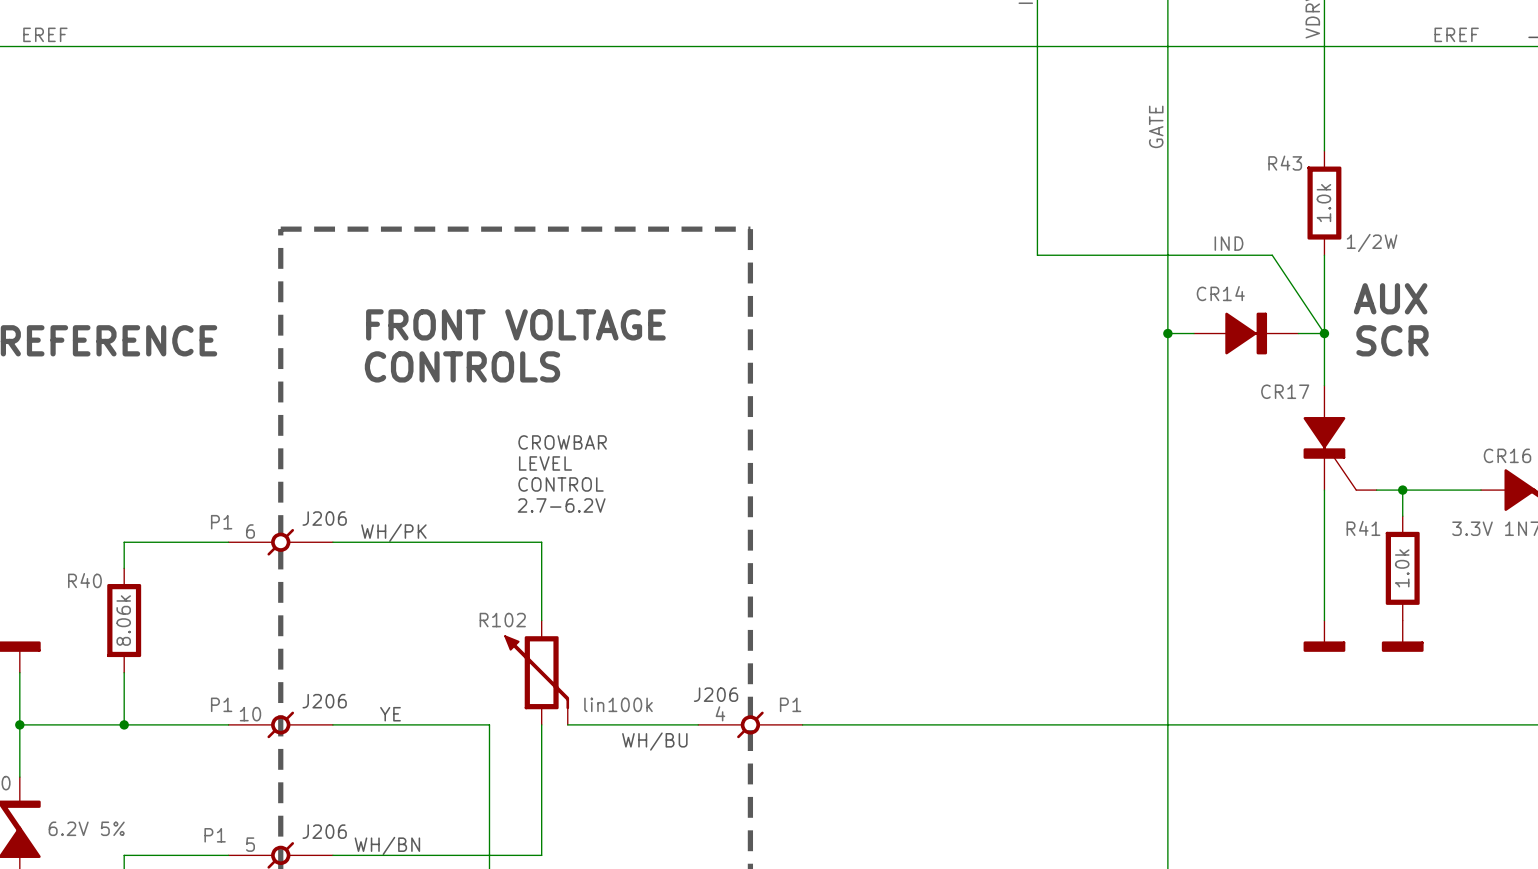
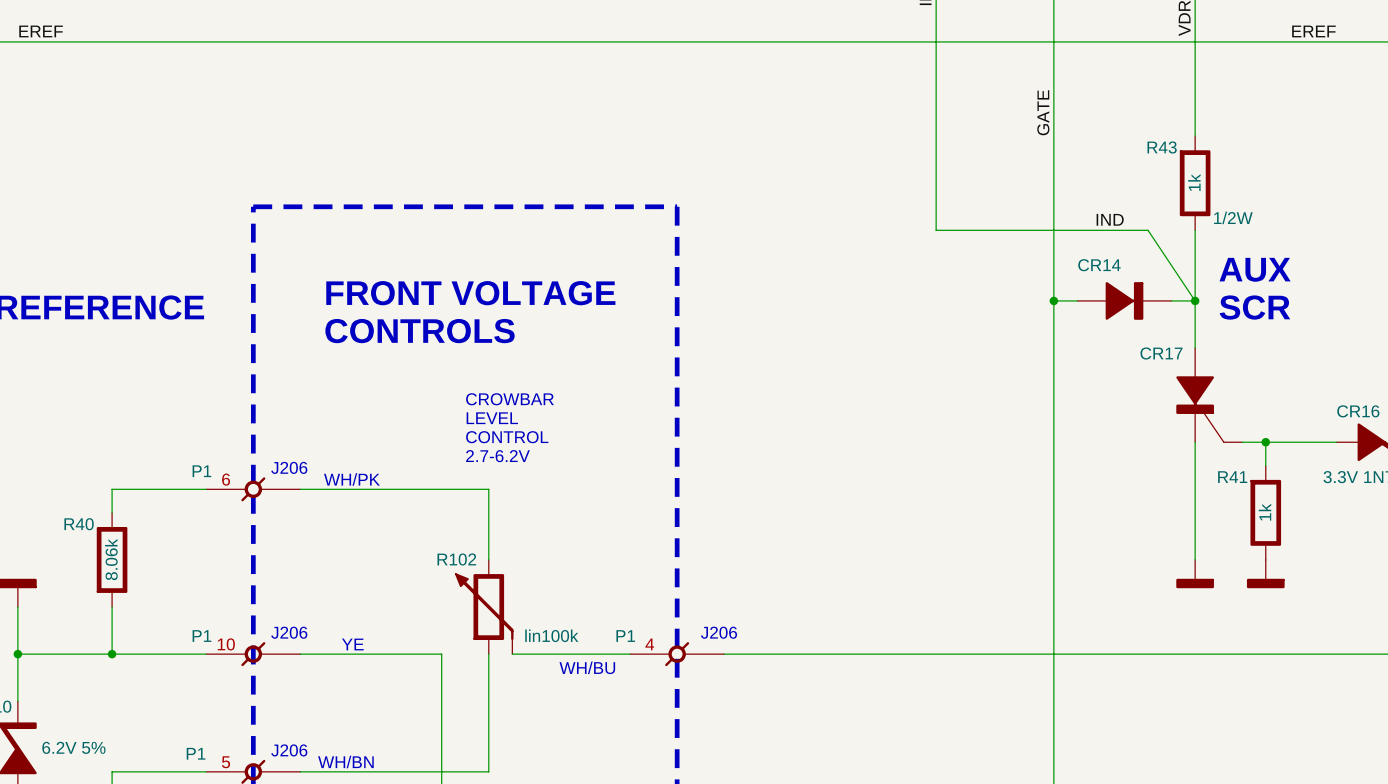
R43 value: 1.0k (1323, 203) -> 1k (1194, 182)
R41 value: 1.0k (1402, 568) -> 1k (1265, 512)
text position: J206 (716, 694) -> J206 (719, 632)
part value position: P1 (790, 704) -> P1 (625, 636)

